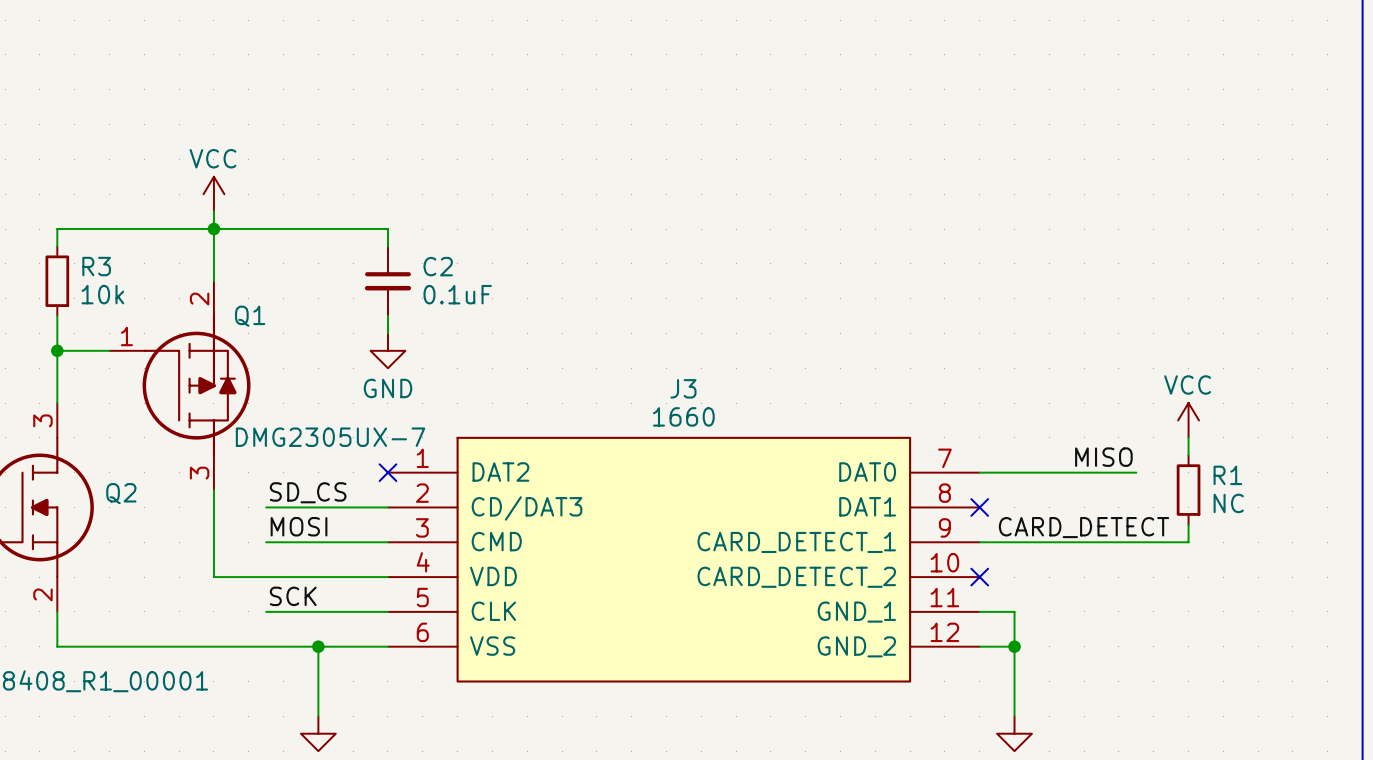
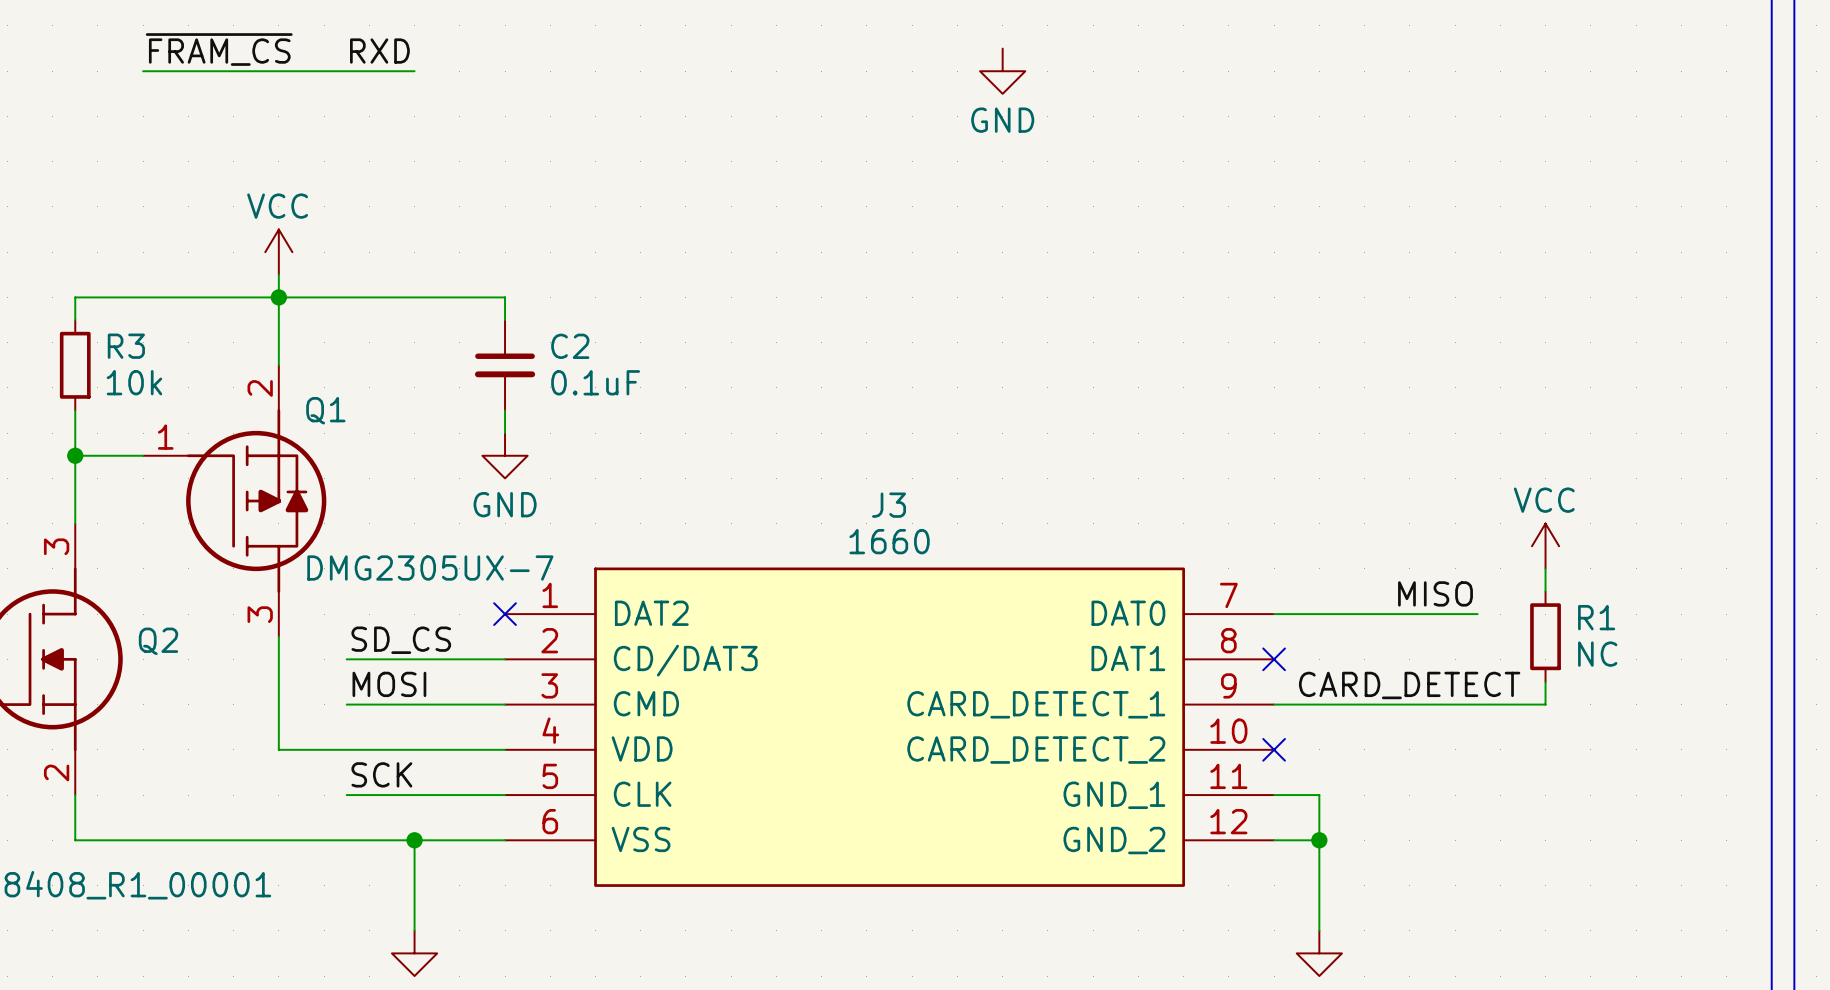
label: none -> ~{FRAM_CS} (219, 49)
label: none -> RXD (379, 51)
wire: none -> (143, 71) (414, 71)
power symbol: none -> GND (1002, 71)

